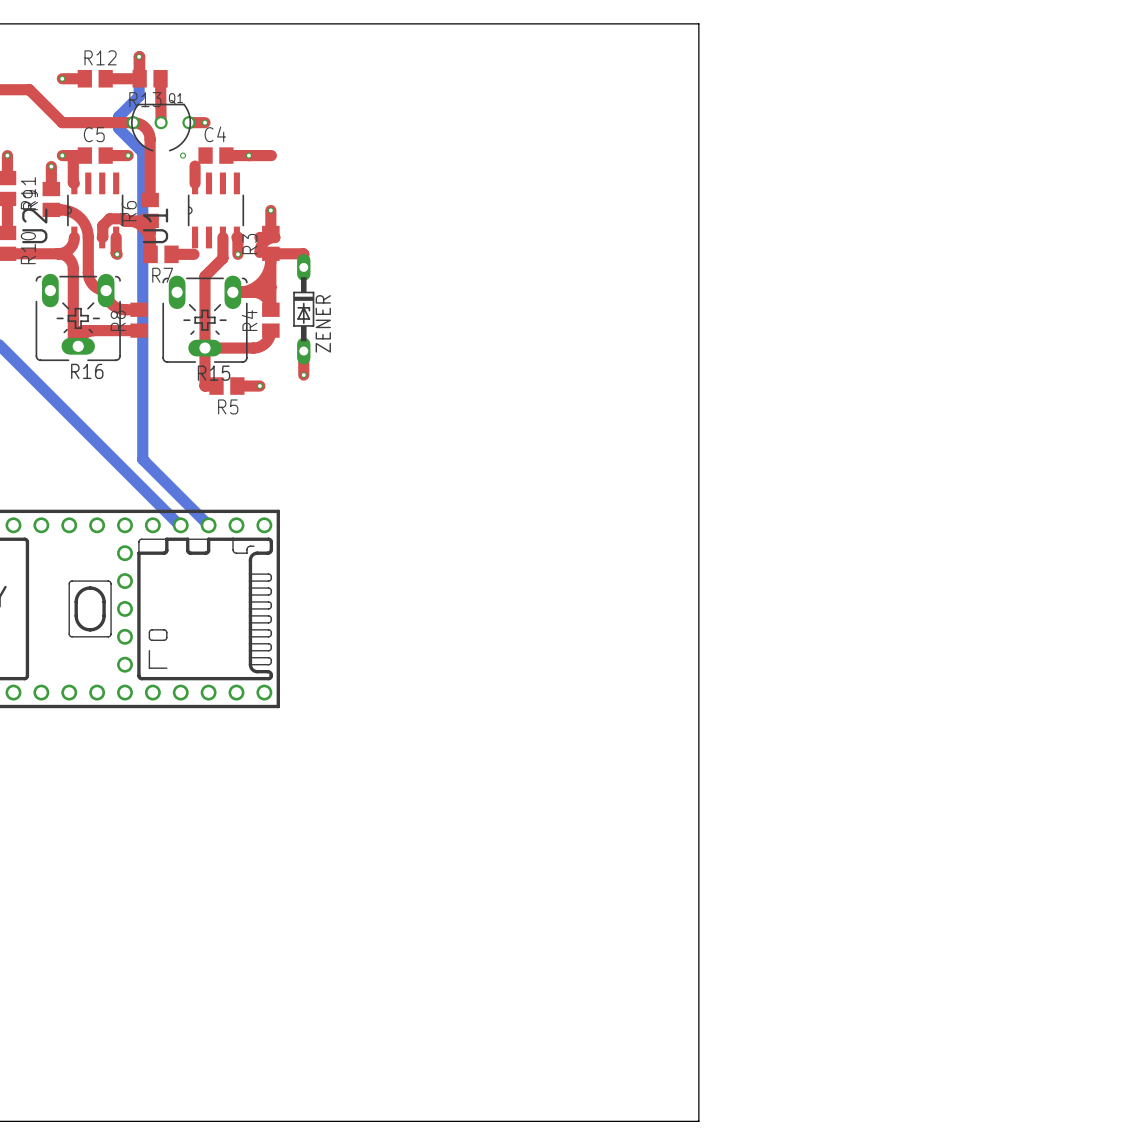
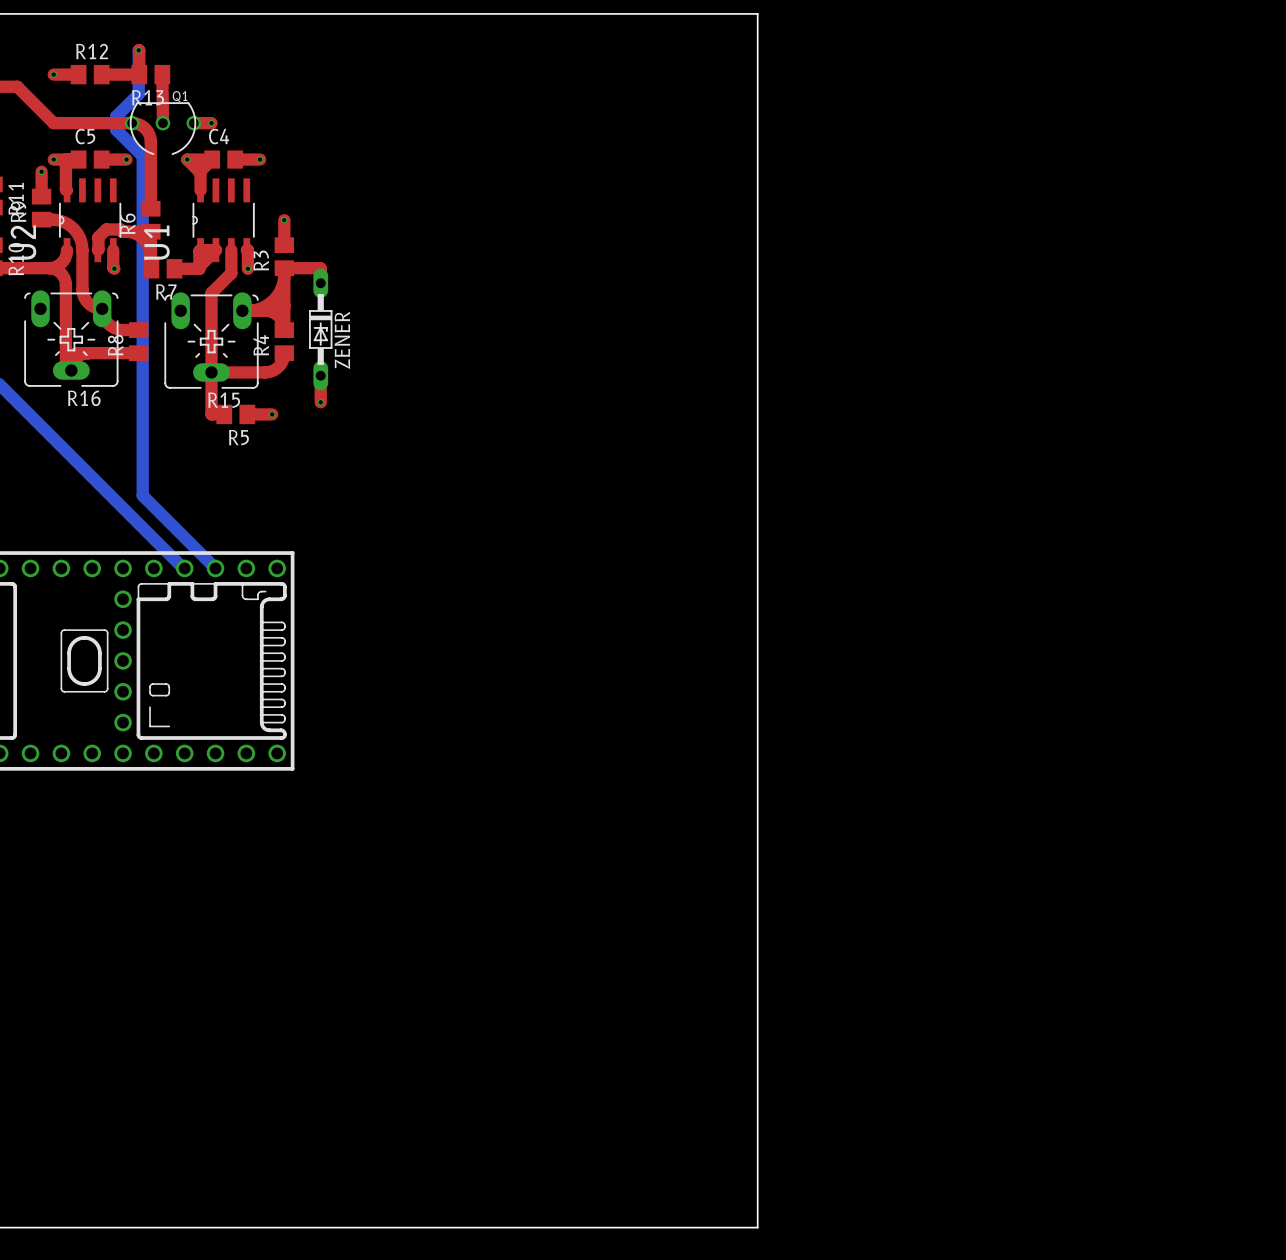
top track: none -> (187, 159) (212, 159) (200, 171) (187, 159)
top track: (248, 155) (271, 155) -> none
top track: (259, 237) (274, 237) (264, 241) (259, 252) -> none
top track: none -> (199, 266) (215, 250) (199, 251) (199, 268)

